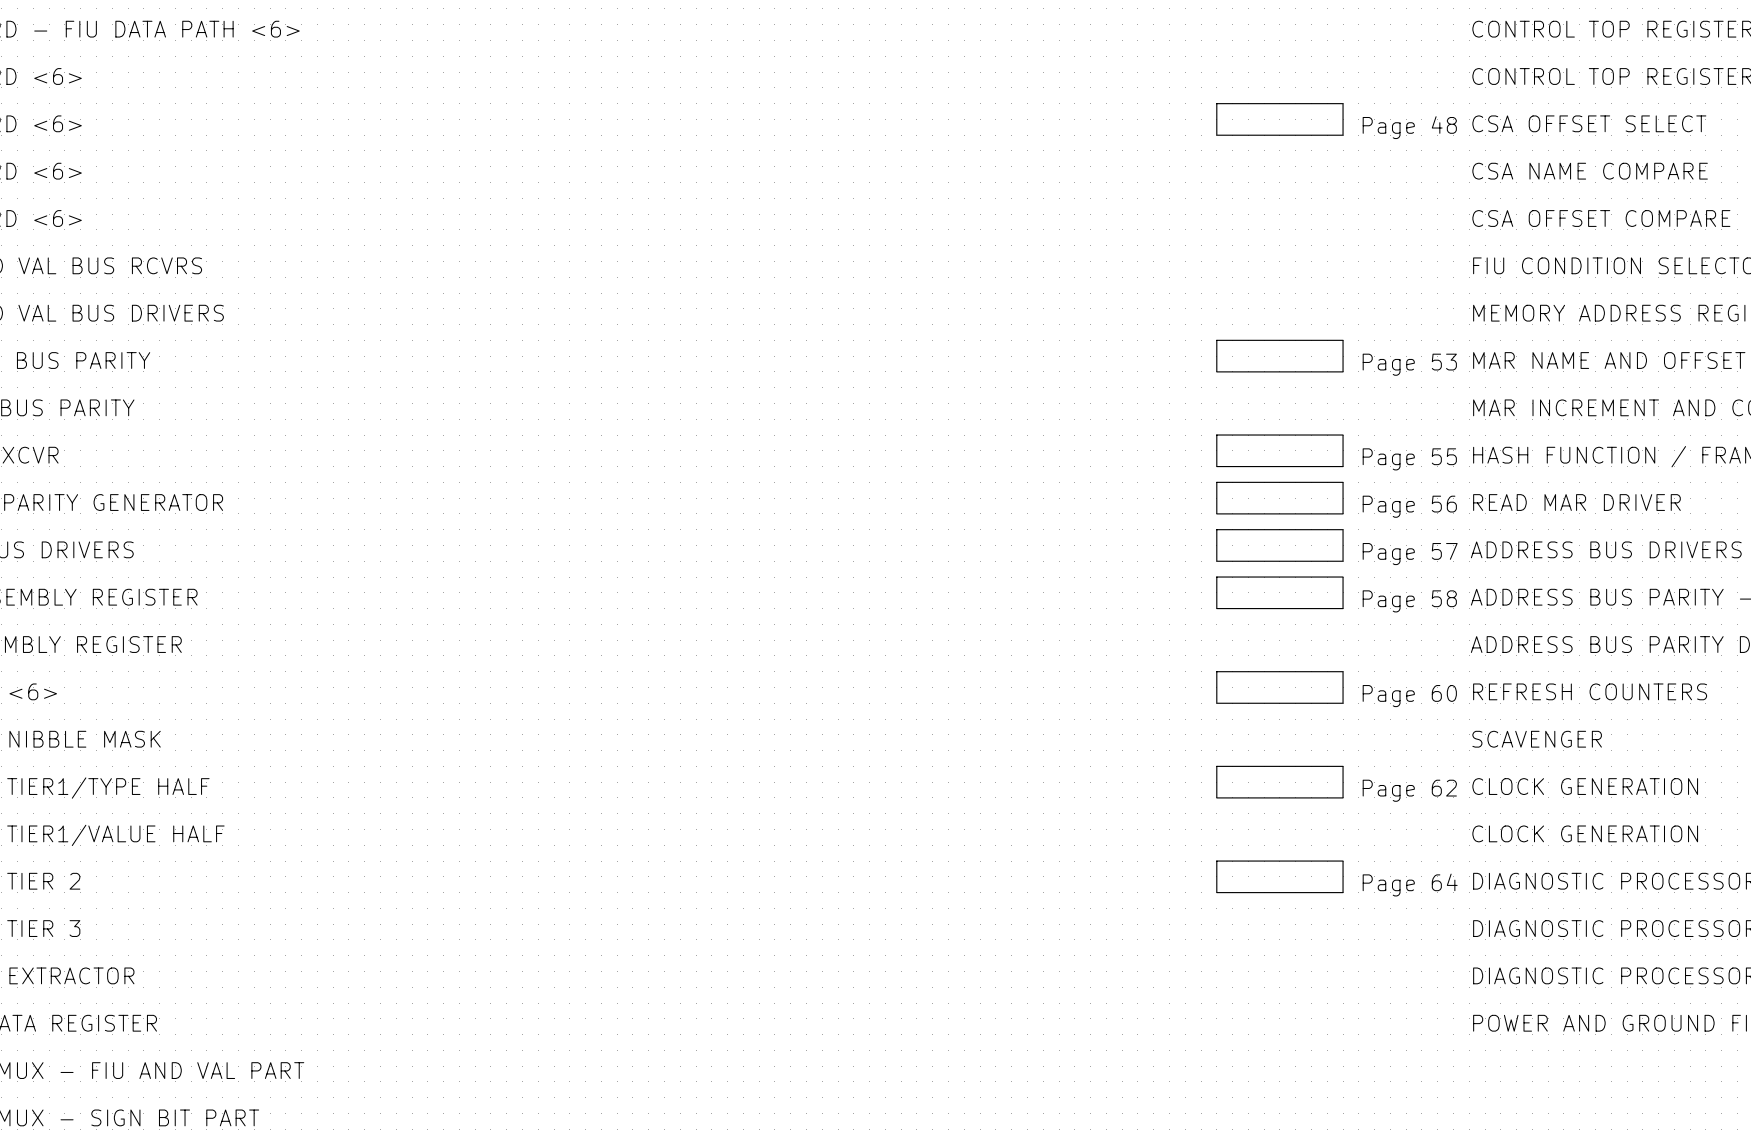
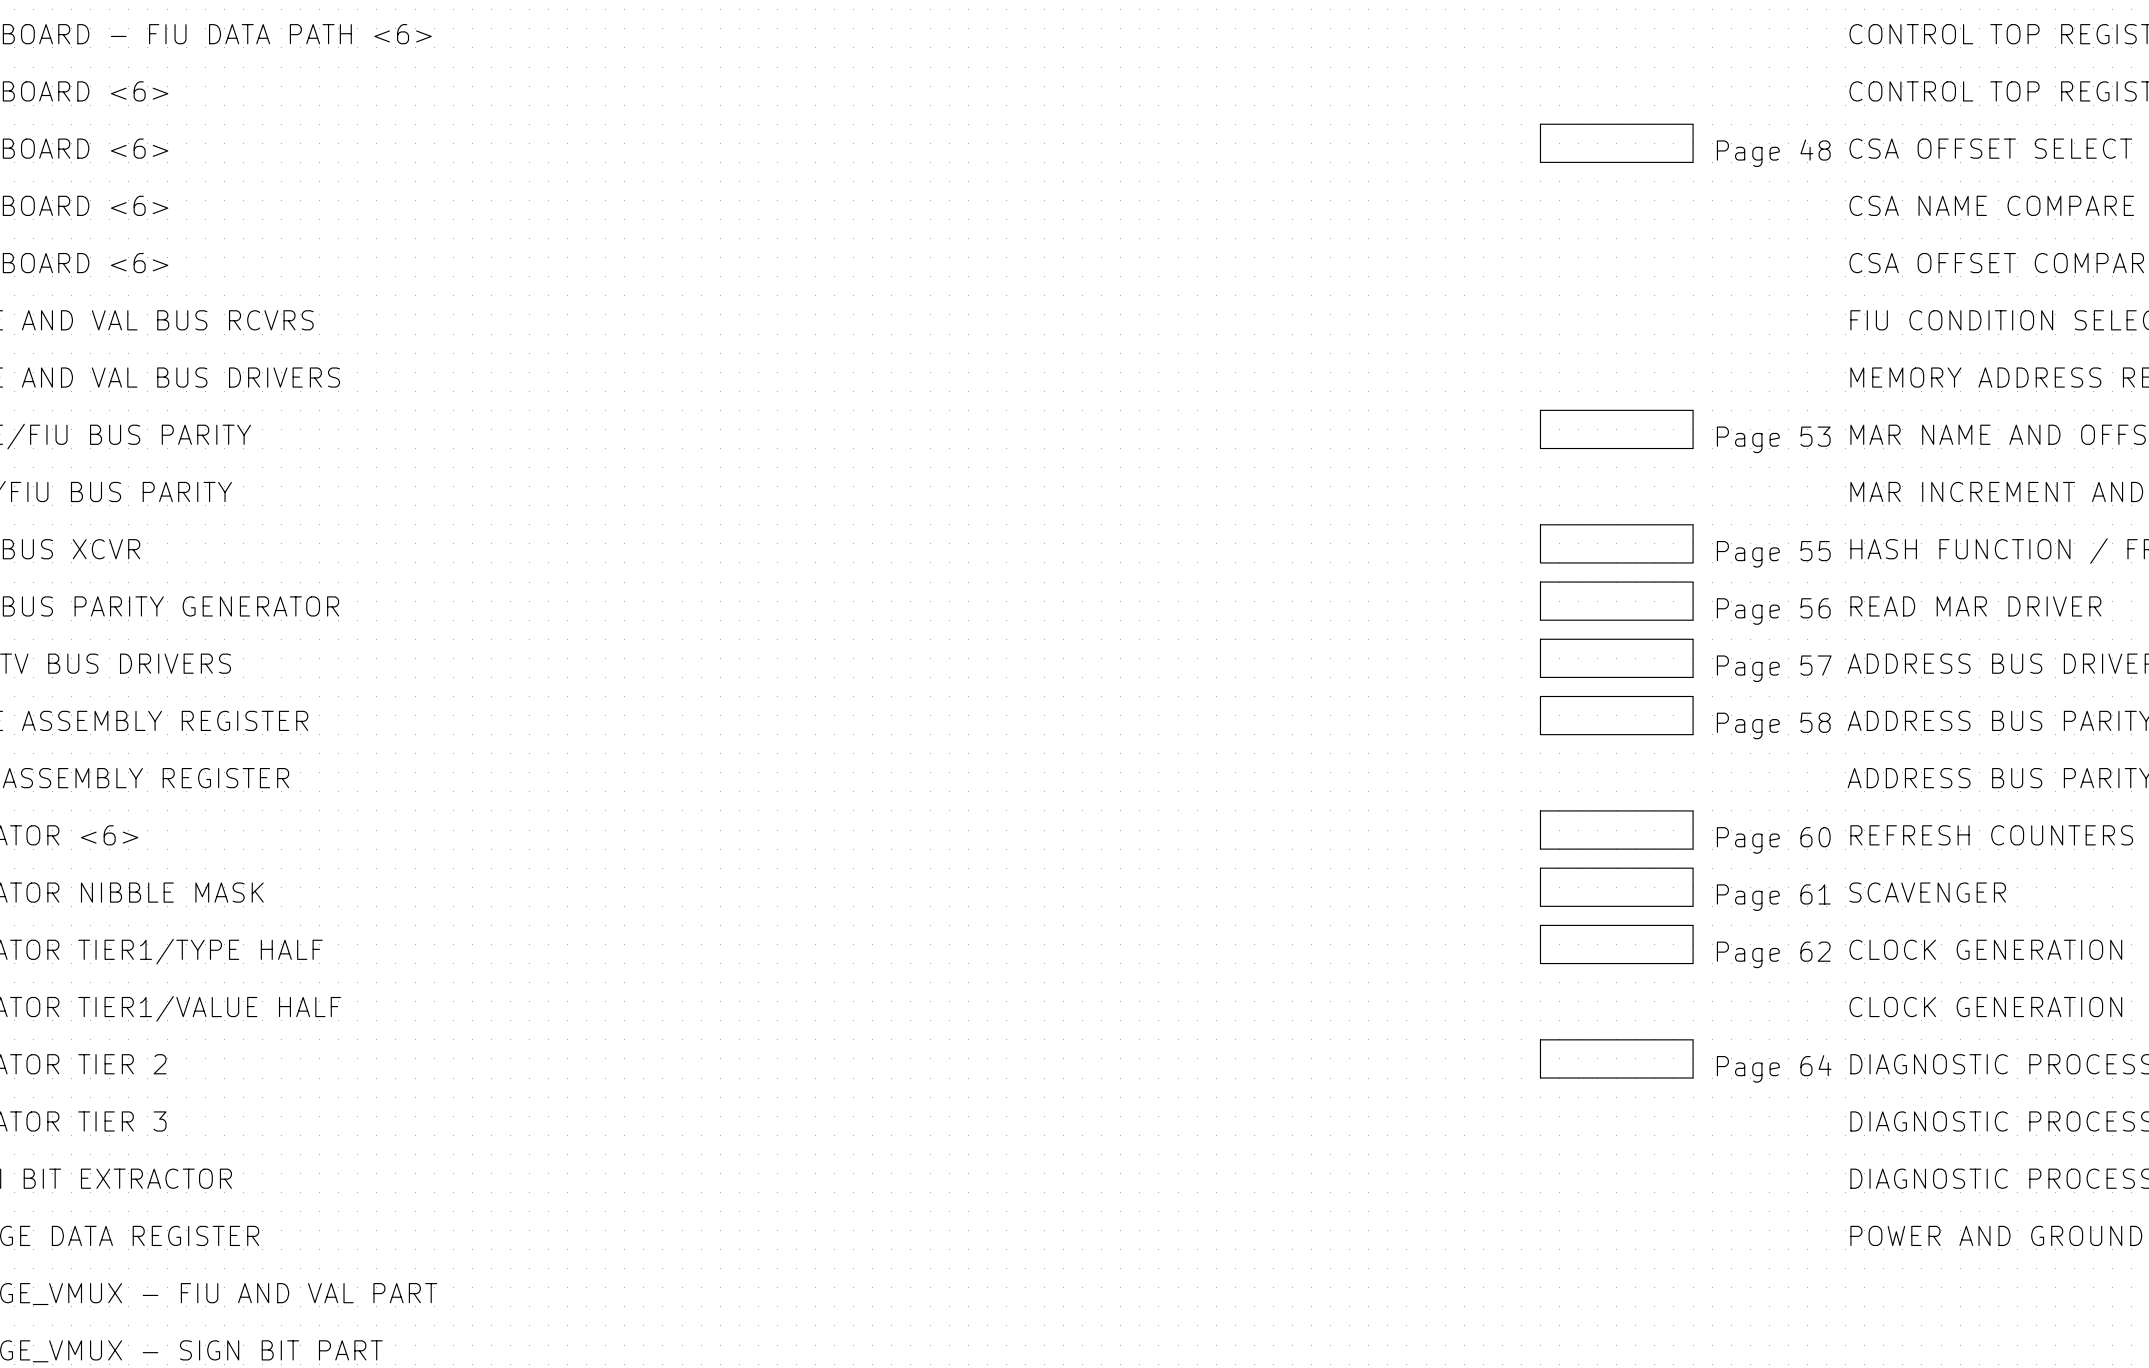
sheet Page 61: none -> (1616, 887)

